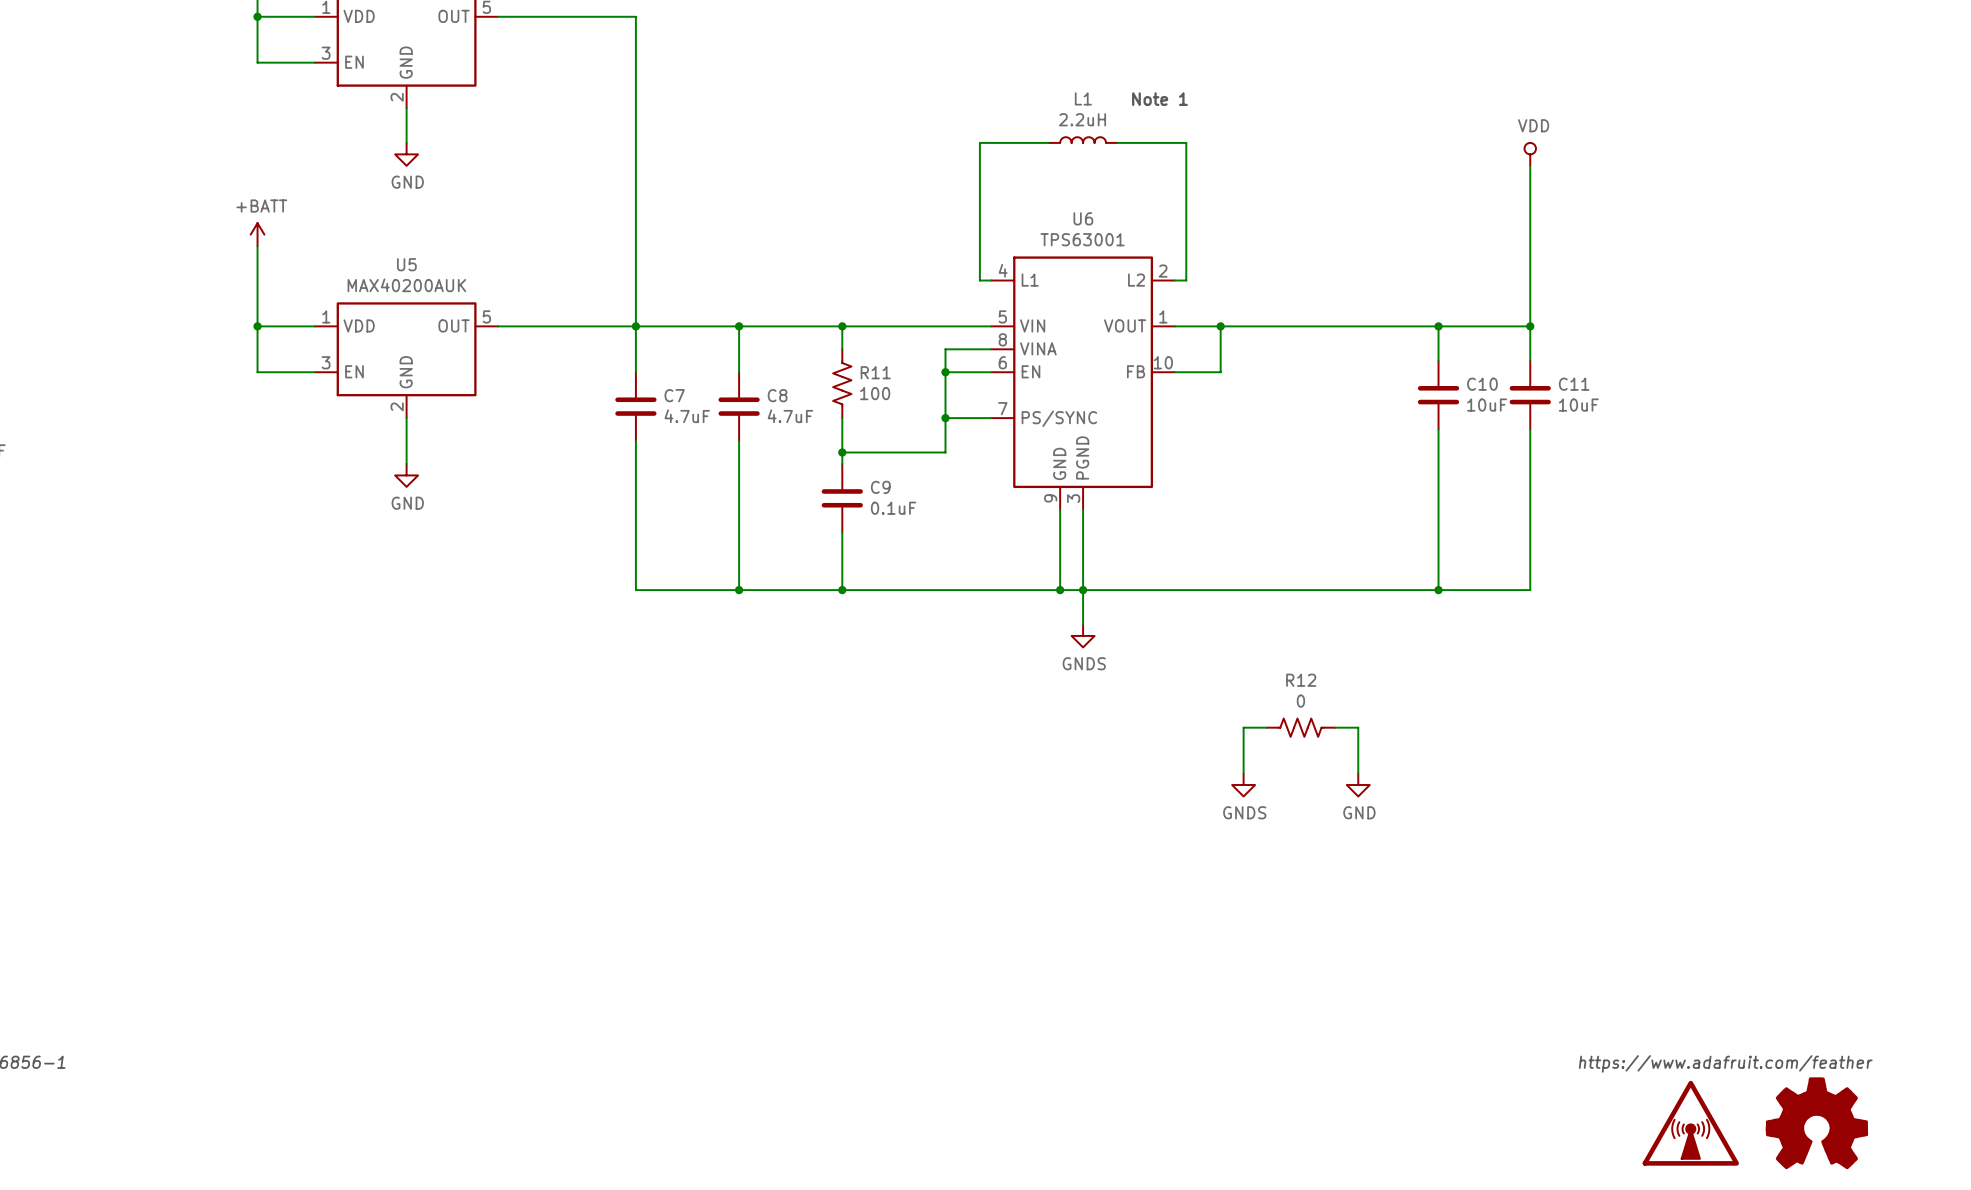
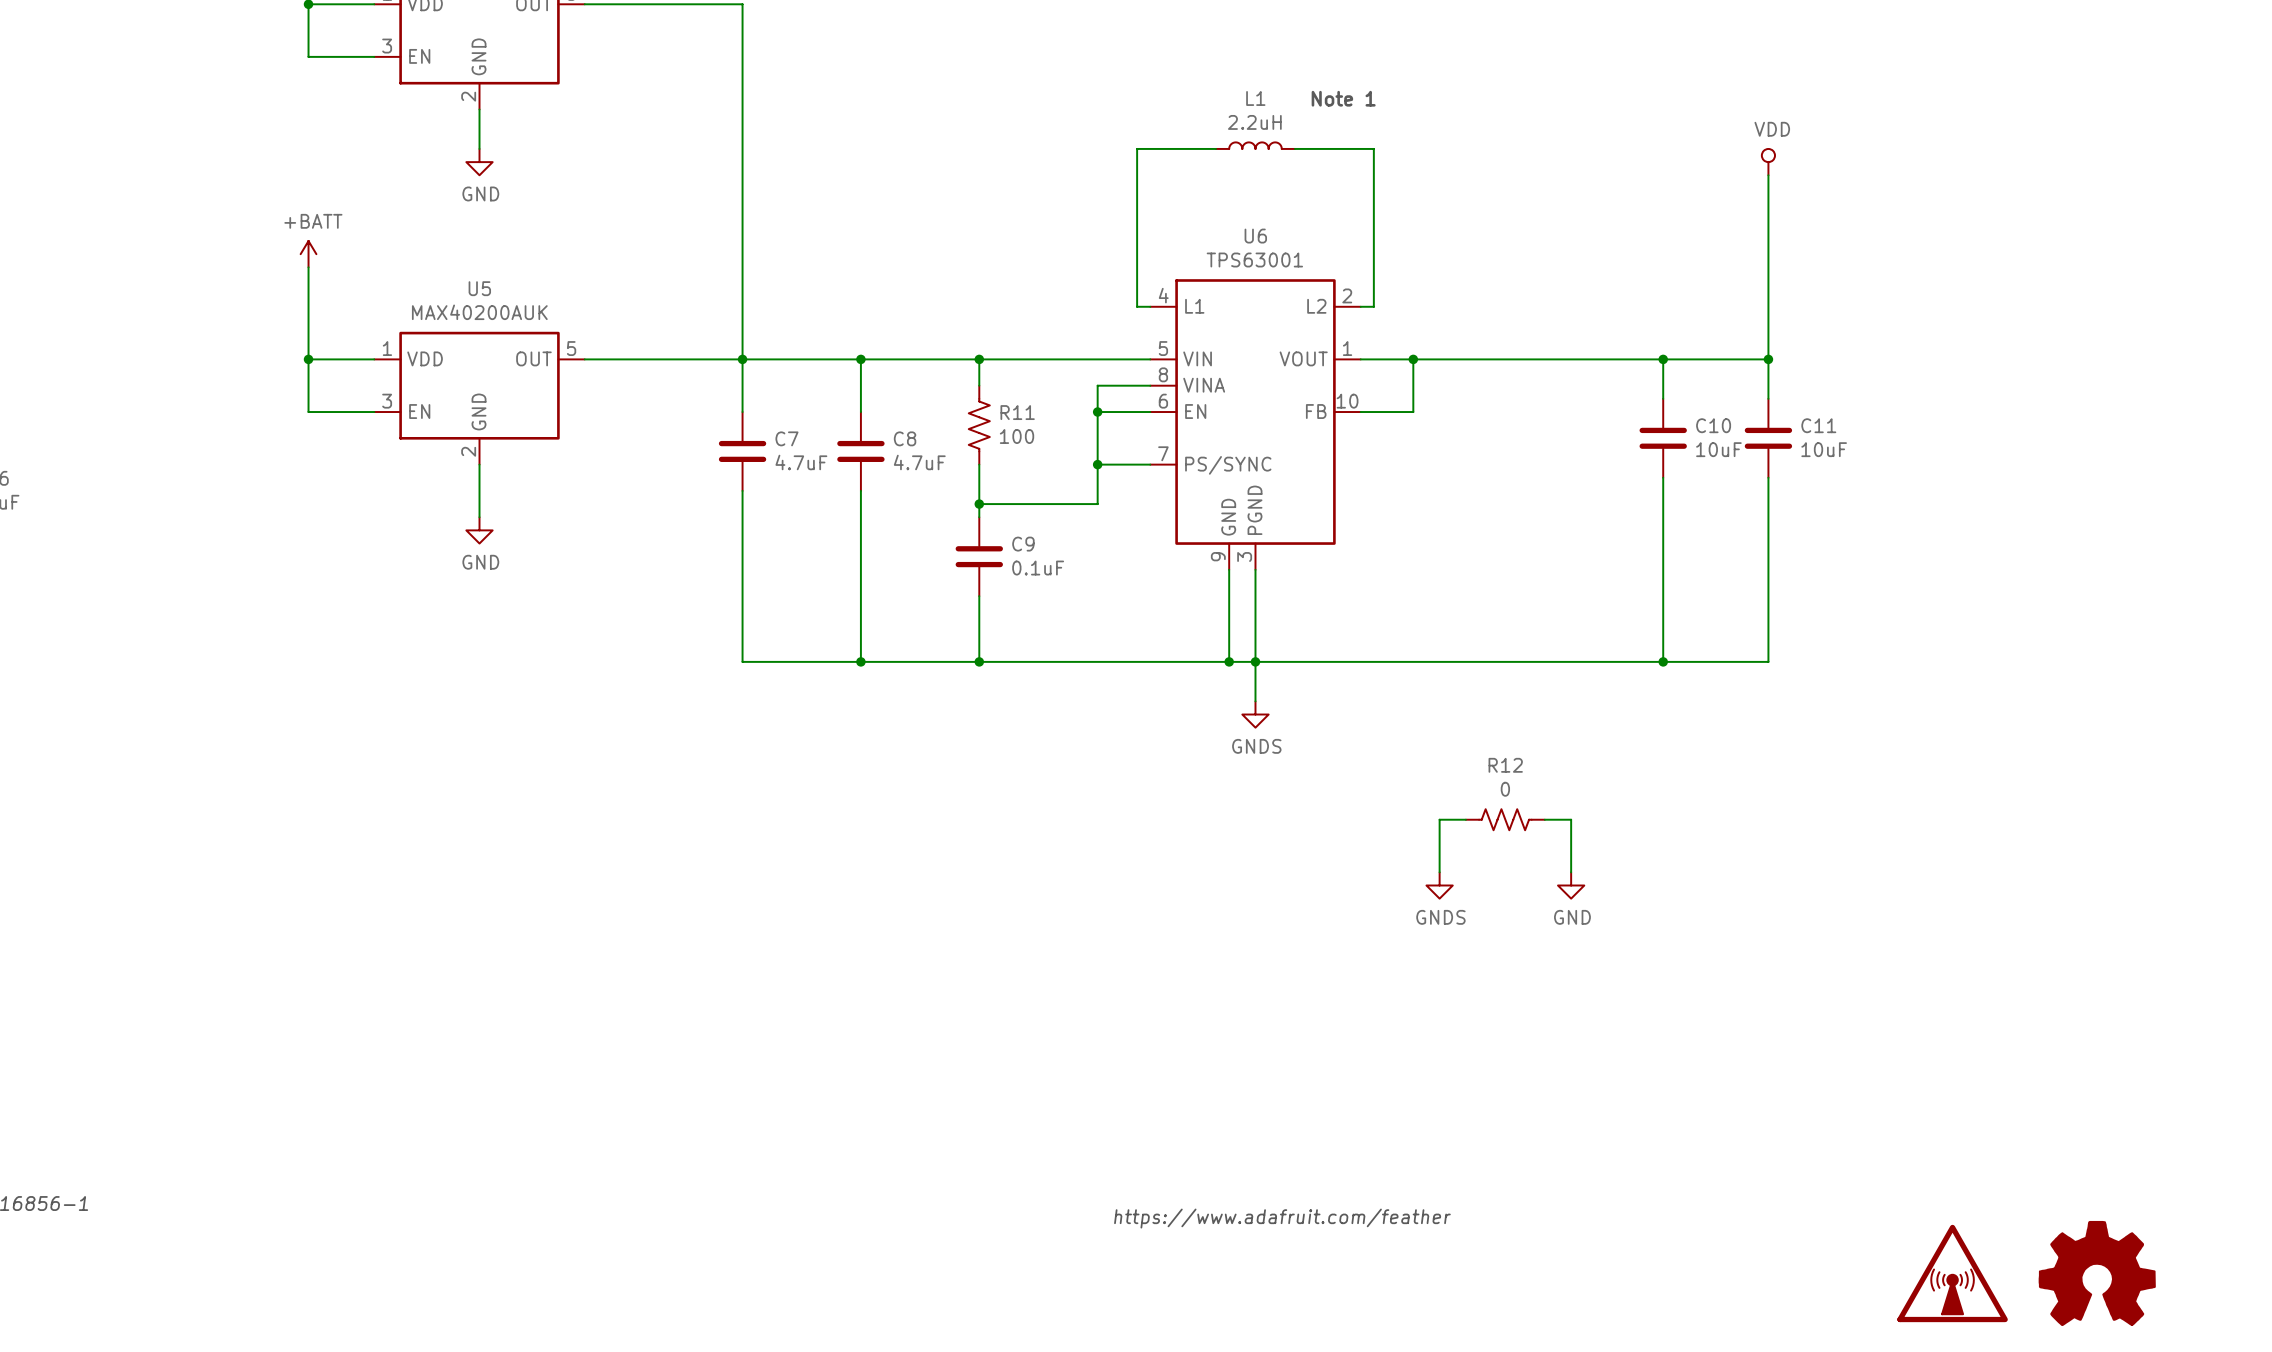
text: https://www.adafruit.com/feather (1725, 1063) -> none
text: none -> https://www.adafruit.com/feather (1282, 1218)

